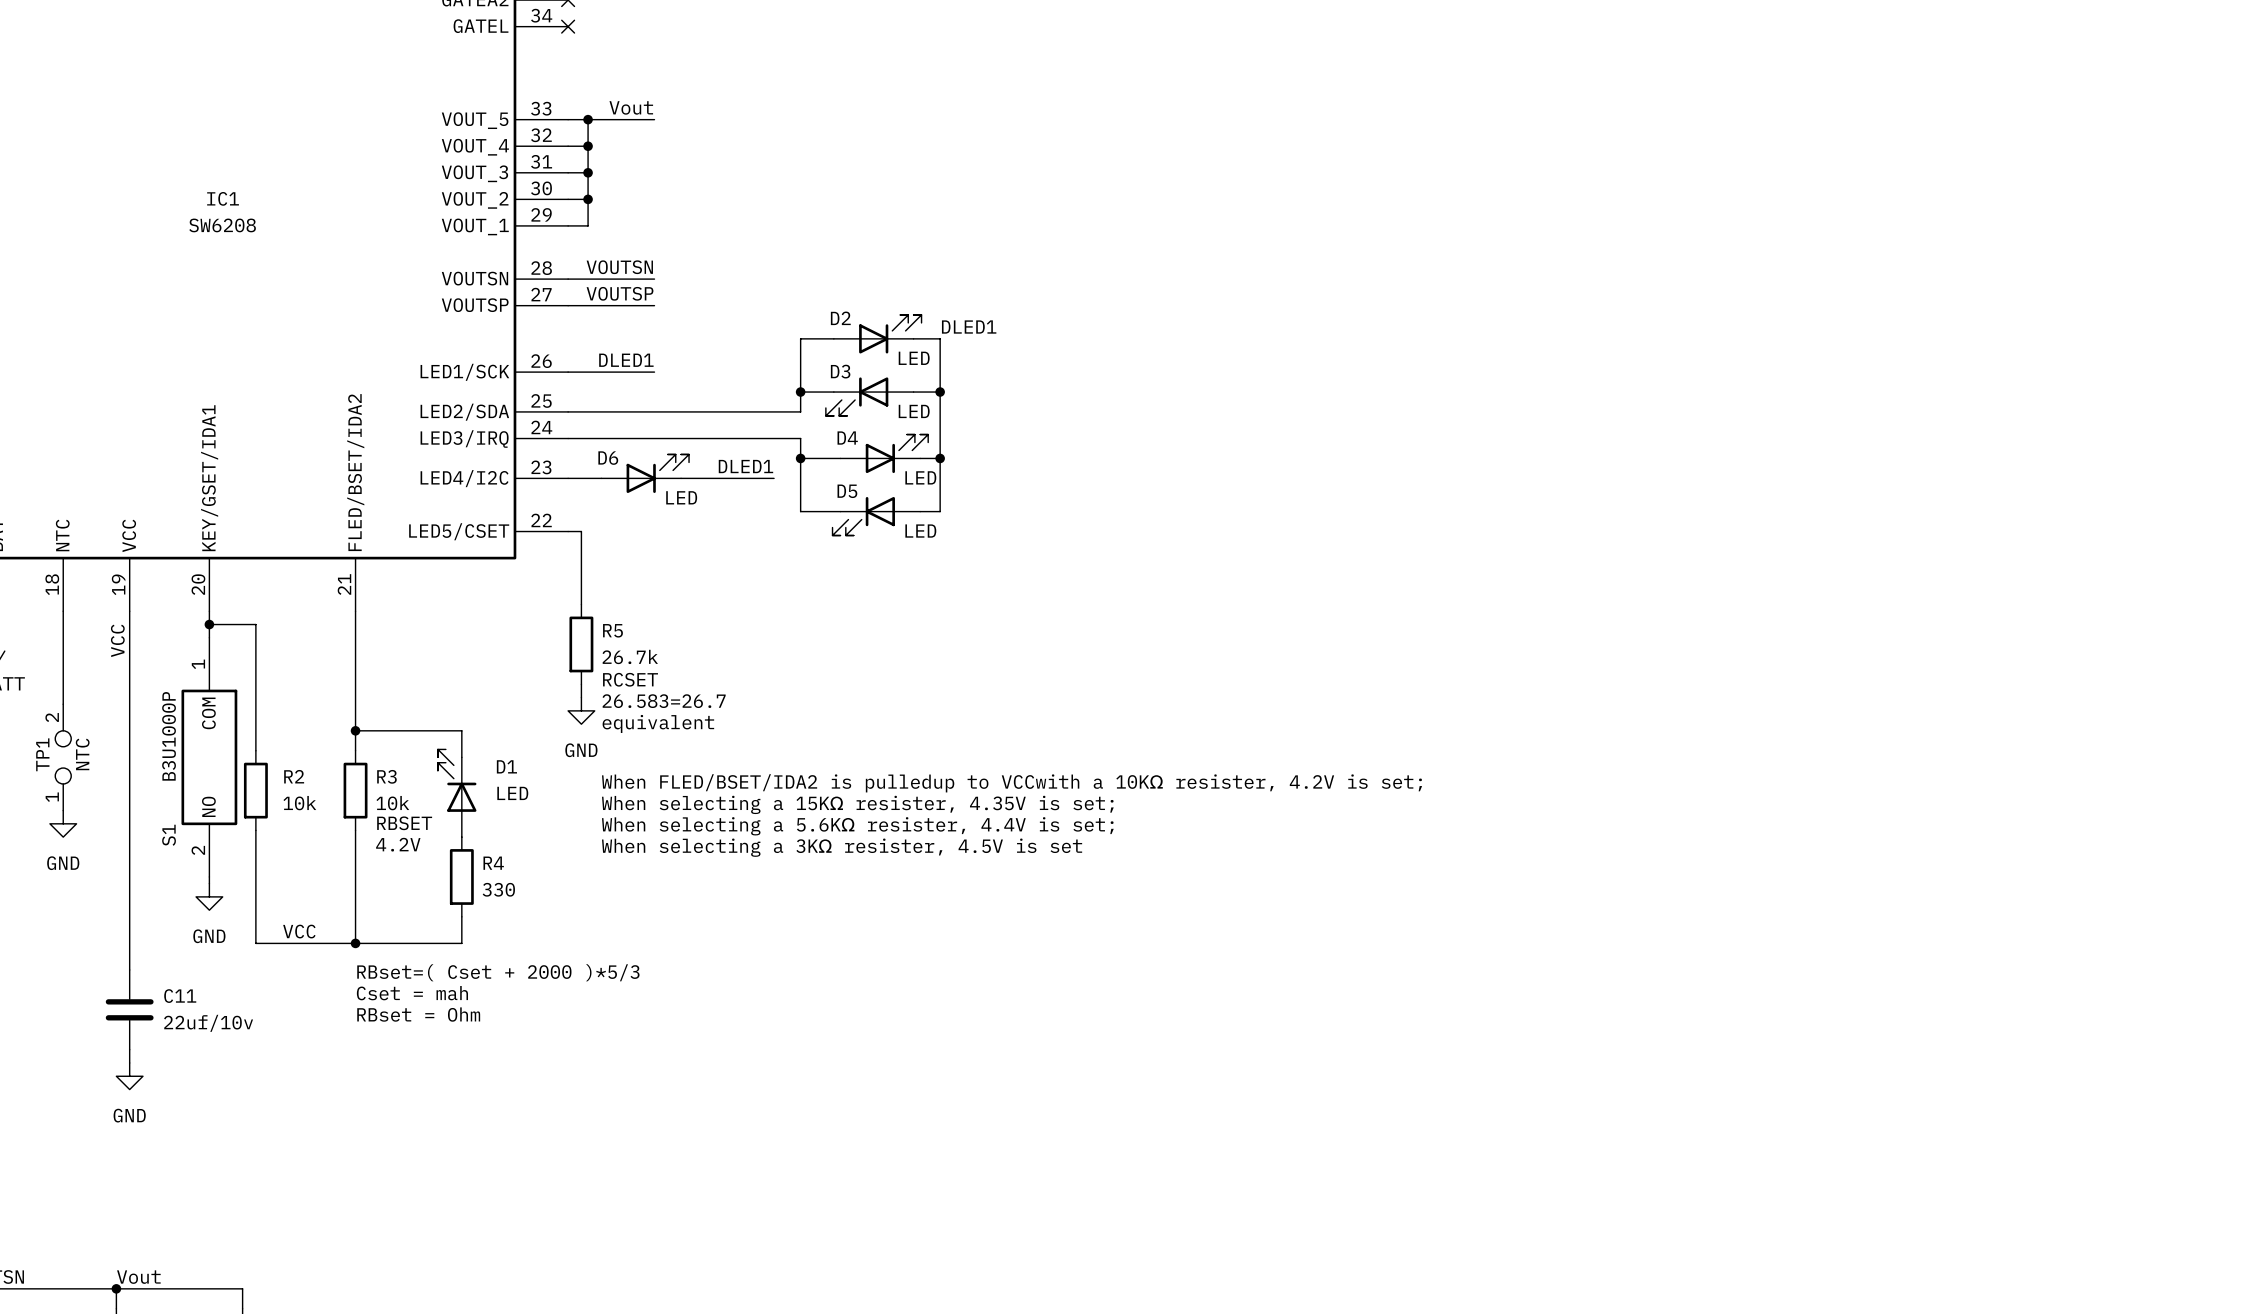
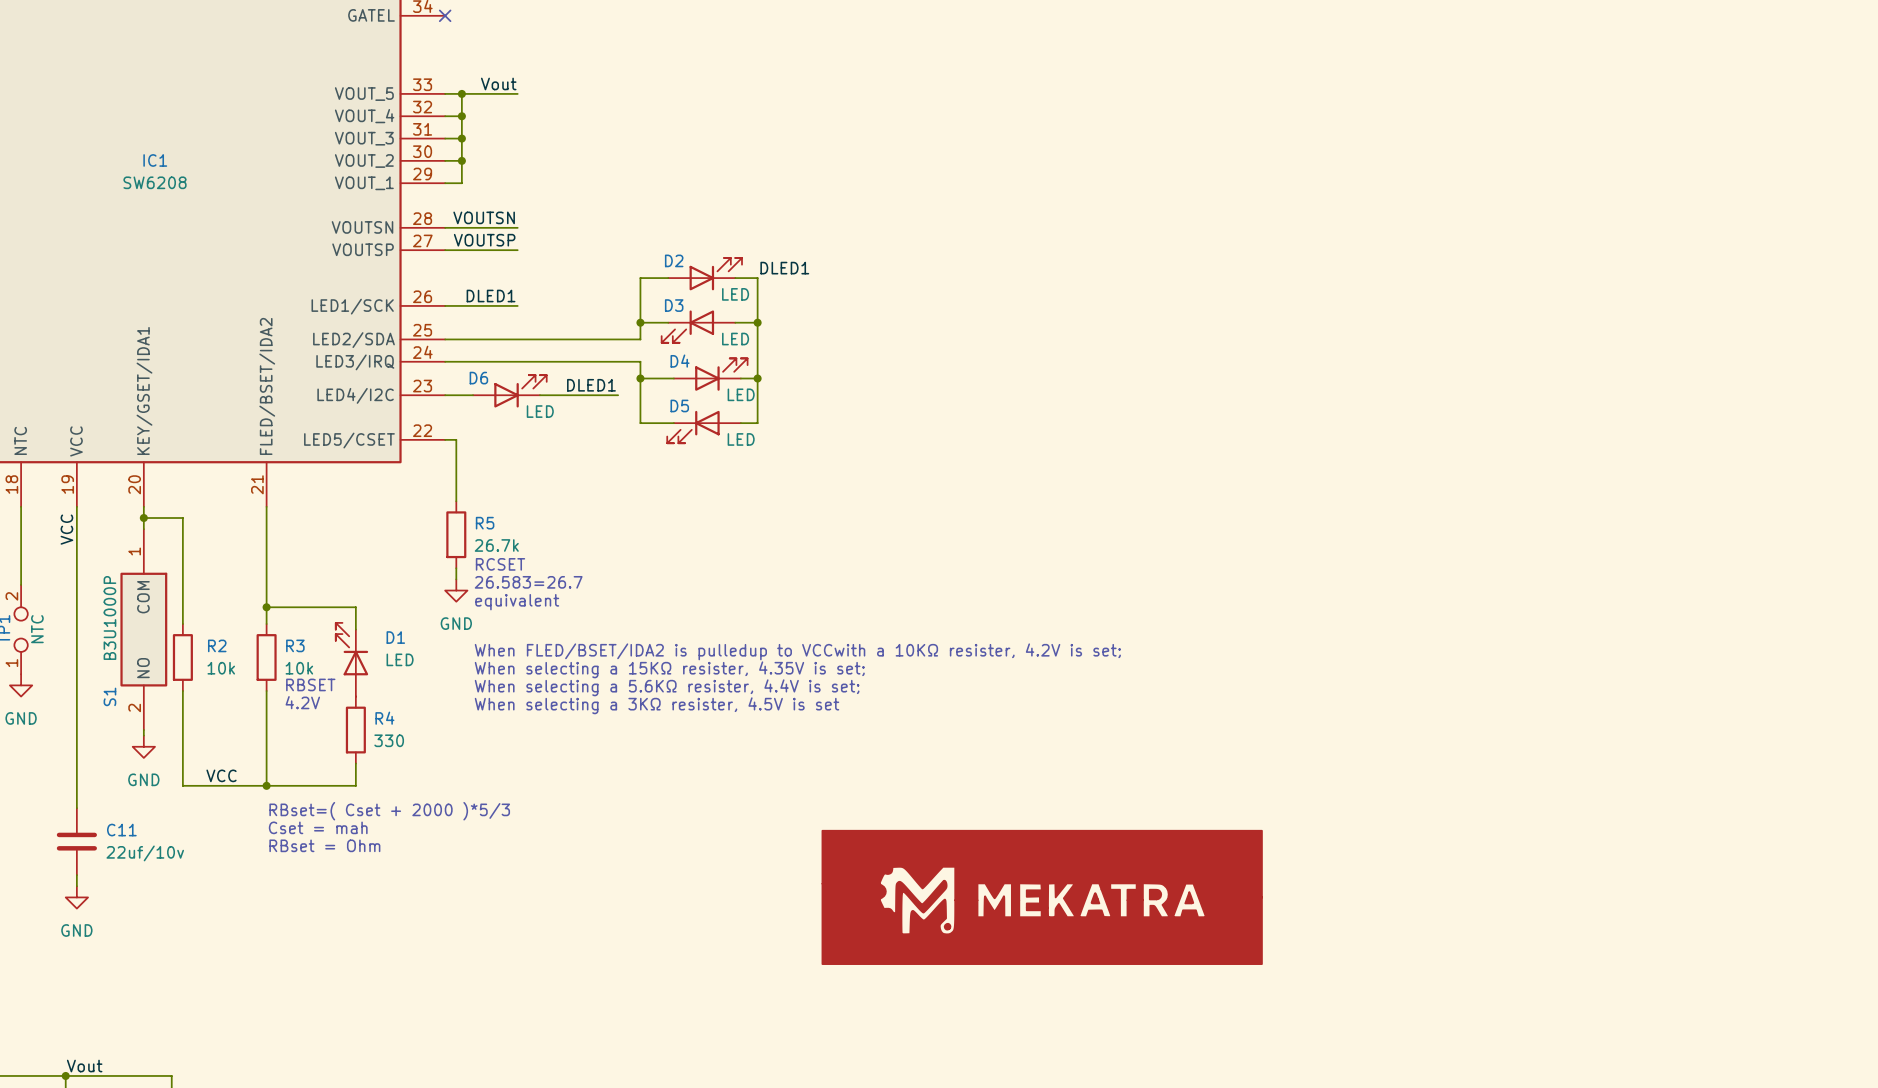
power symbol: none -> (1042, 897)

